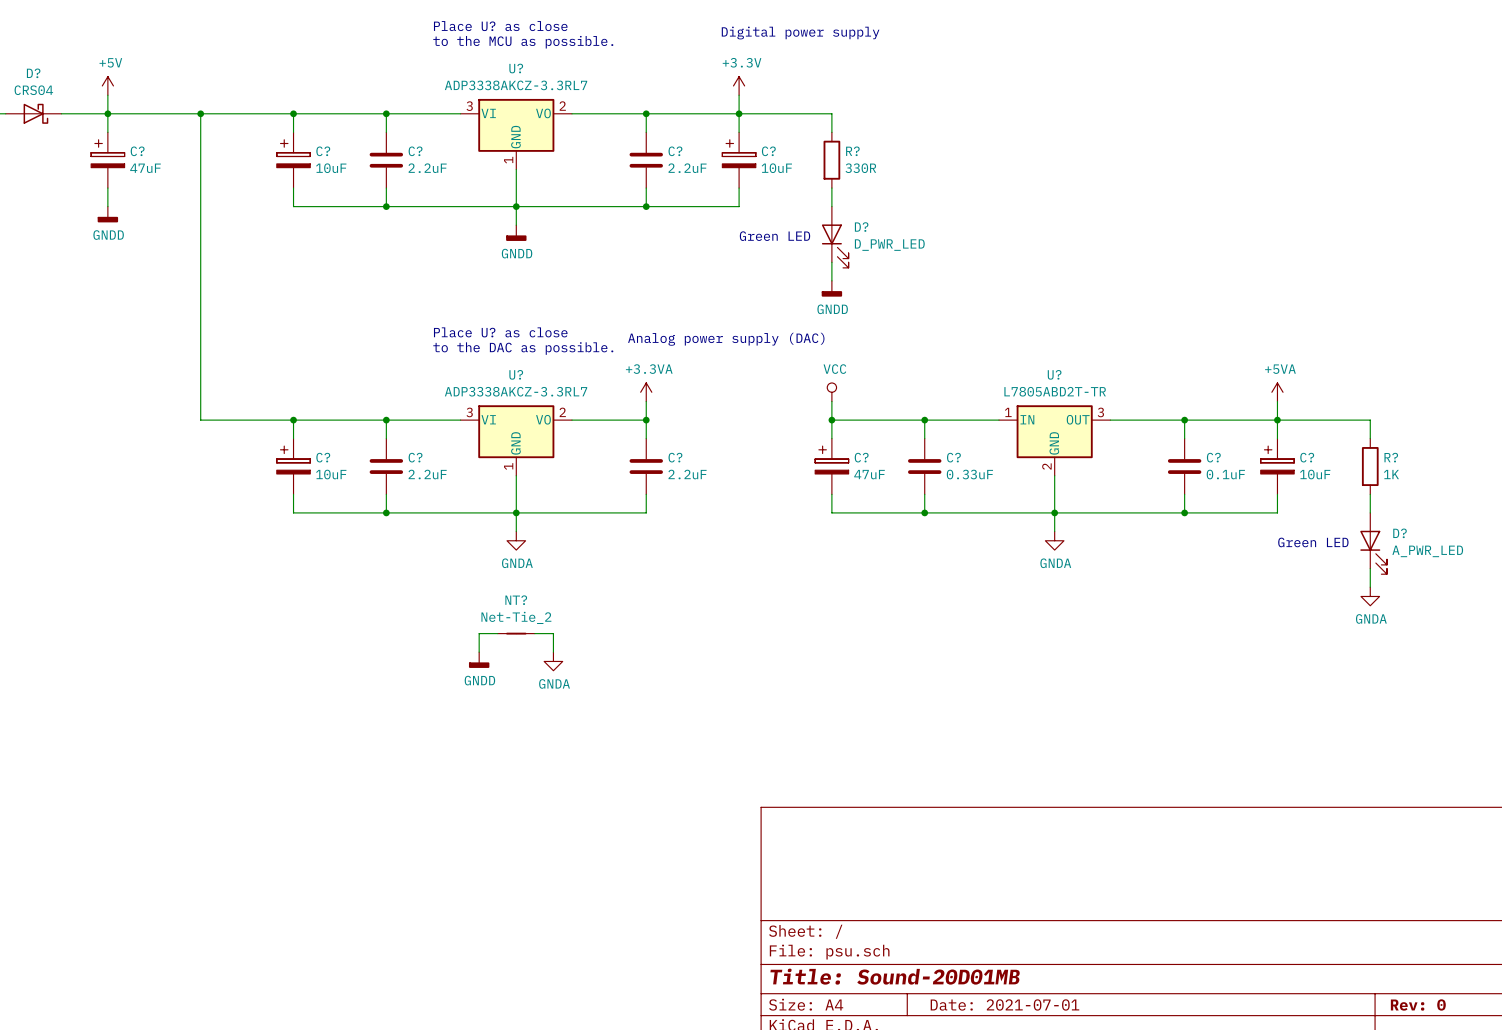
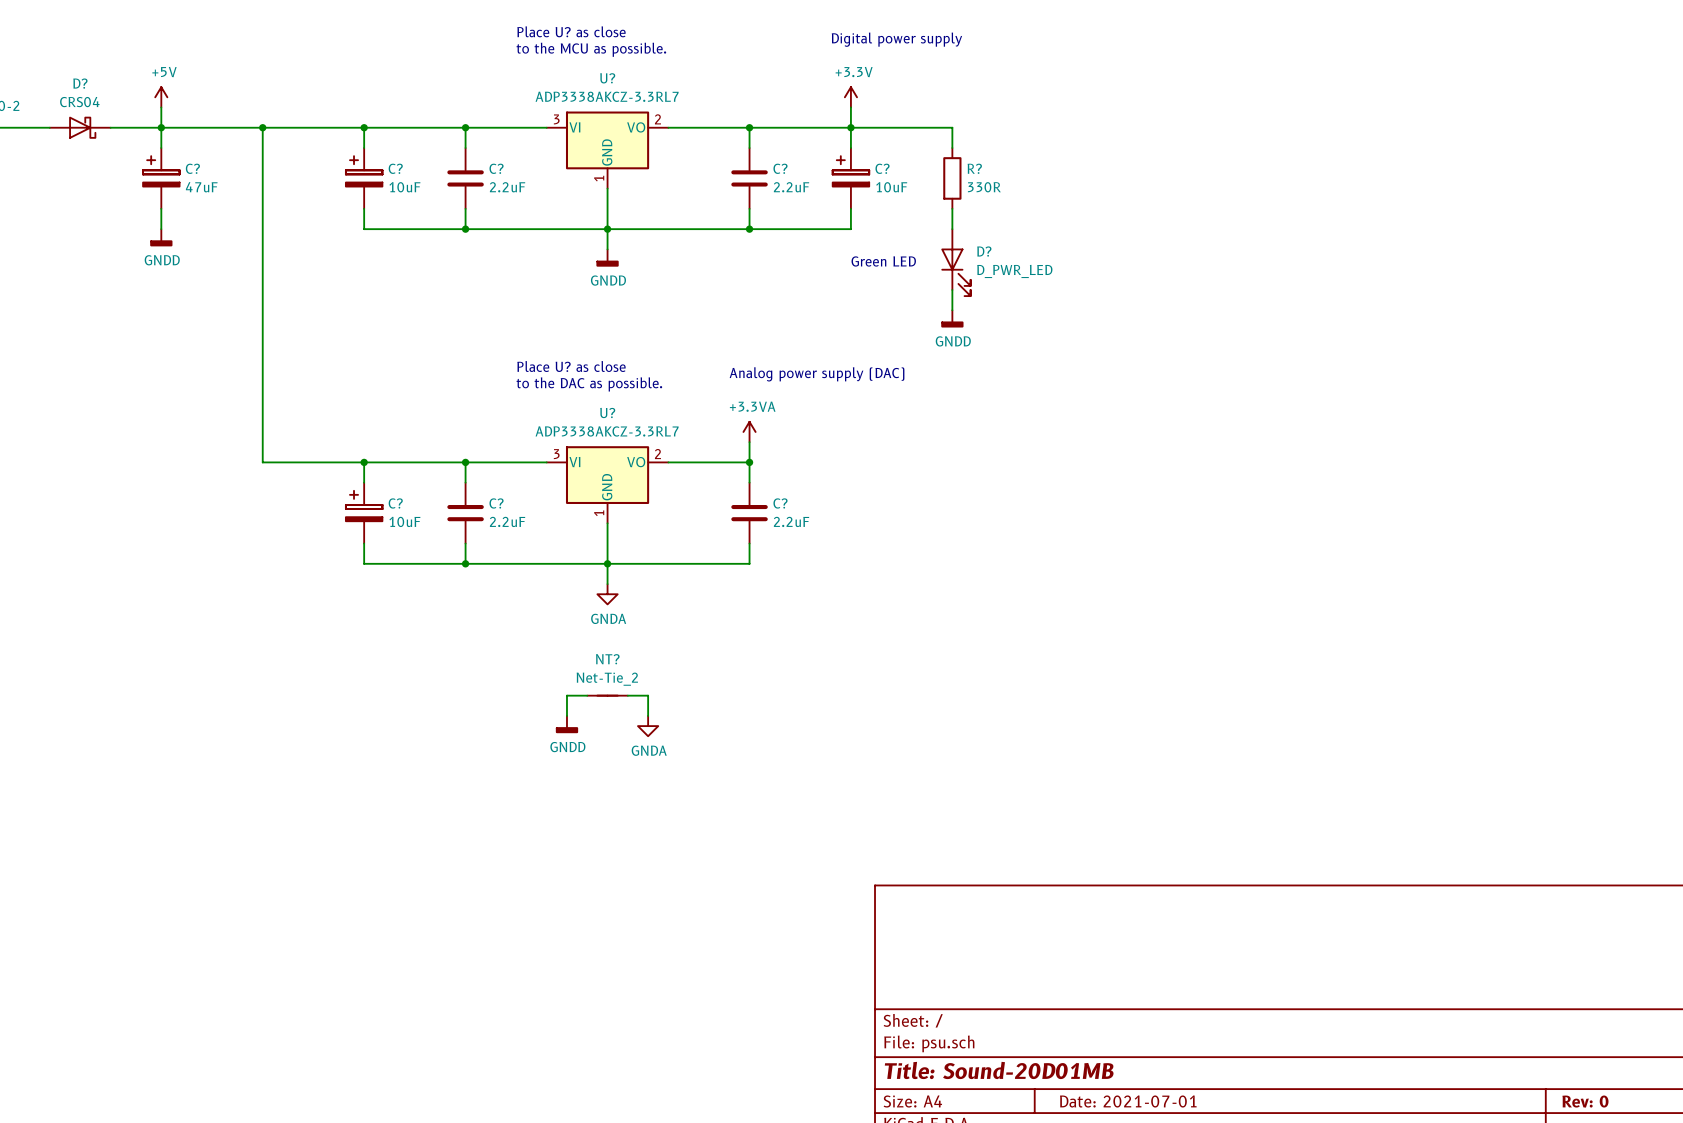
power symbol: VCC (831, 392) -> none
power symbol: +5VA (1277, 392) -> none
wire: (831, 401) (831, 438) -> none
wire: (1277, 401) (1277, 438) -> none
wire: (831, 420) (998, 420) -> none
junction: (831, 420) -> none
wire: (924, 420) (924, 438) -> none
junction: (924, 420) -> none
wire: (1110, 420) (1370, 420) (1370, 438) -> none
wire: (1184, 420) (1184, 438) -> none
junction: (1184, 420) -> none
junction: (1277, 420) -> none
U?: L7805ABD2T-TR (1054, 440) -> none
C?: 47uF (831, 466) -> none
C?: 0.33uF (924, 466) -> none
C?: 0.1uF (1184, 466) -> none
C?: 10uF (1277, 466) -> none
R?: 1K (1370, 466) -> none
wire: (1054, 475) (1054, 531) -> none
wire: (831, 494) (831, 512) (1277, 512) (1277, 494) -> none
wire: (924, 494) (924, 512) -> none
wire: (1184, 494) (1184, 512) -> none
wire: (1370, 494) (1370, 512) -> none
junction: (924, 512) -> none
junction: (1054, 512) -> none
junction: (1184, 512) -> none
power symbol: GNDA (1054, 540) -> none
text: Green LED (1313, 542) -> none
D?: A_PWR_LED (1373, 543) -> none
wire: (1370, 568) (1370, 587) -> none
power symbol: GNDA (1370, 596) -> none

